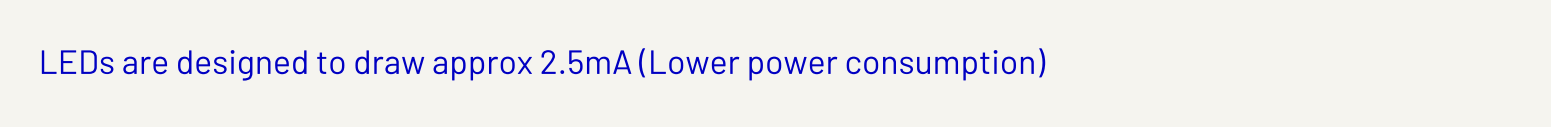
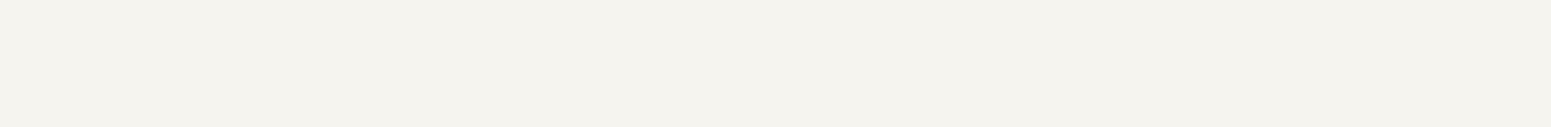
text: LEDs are designed to draw approx 2.5mA (Lower power consumption) (543, 64) -> none

